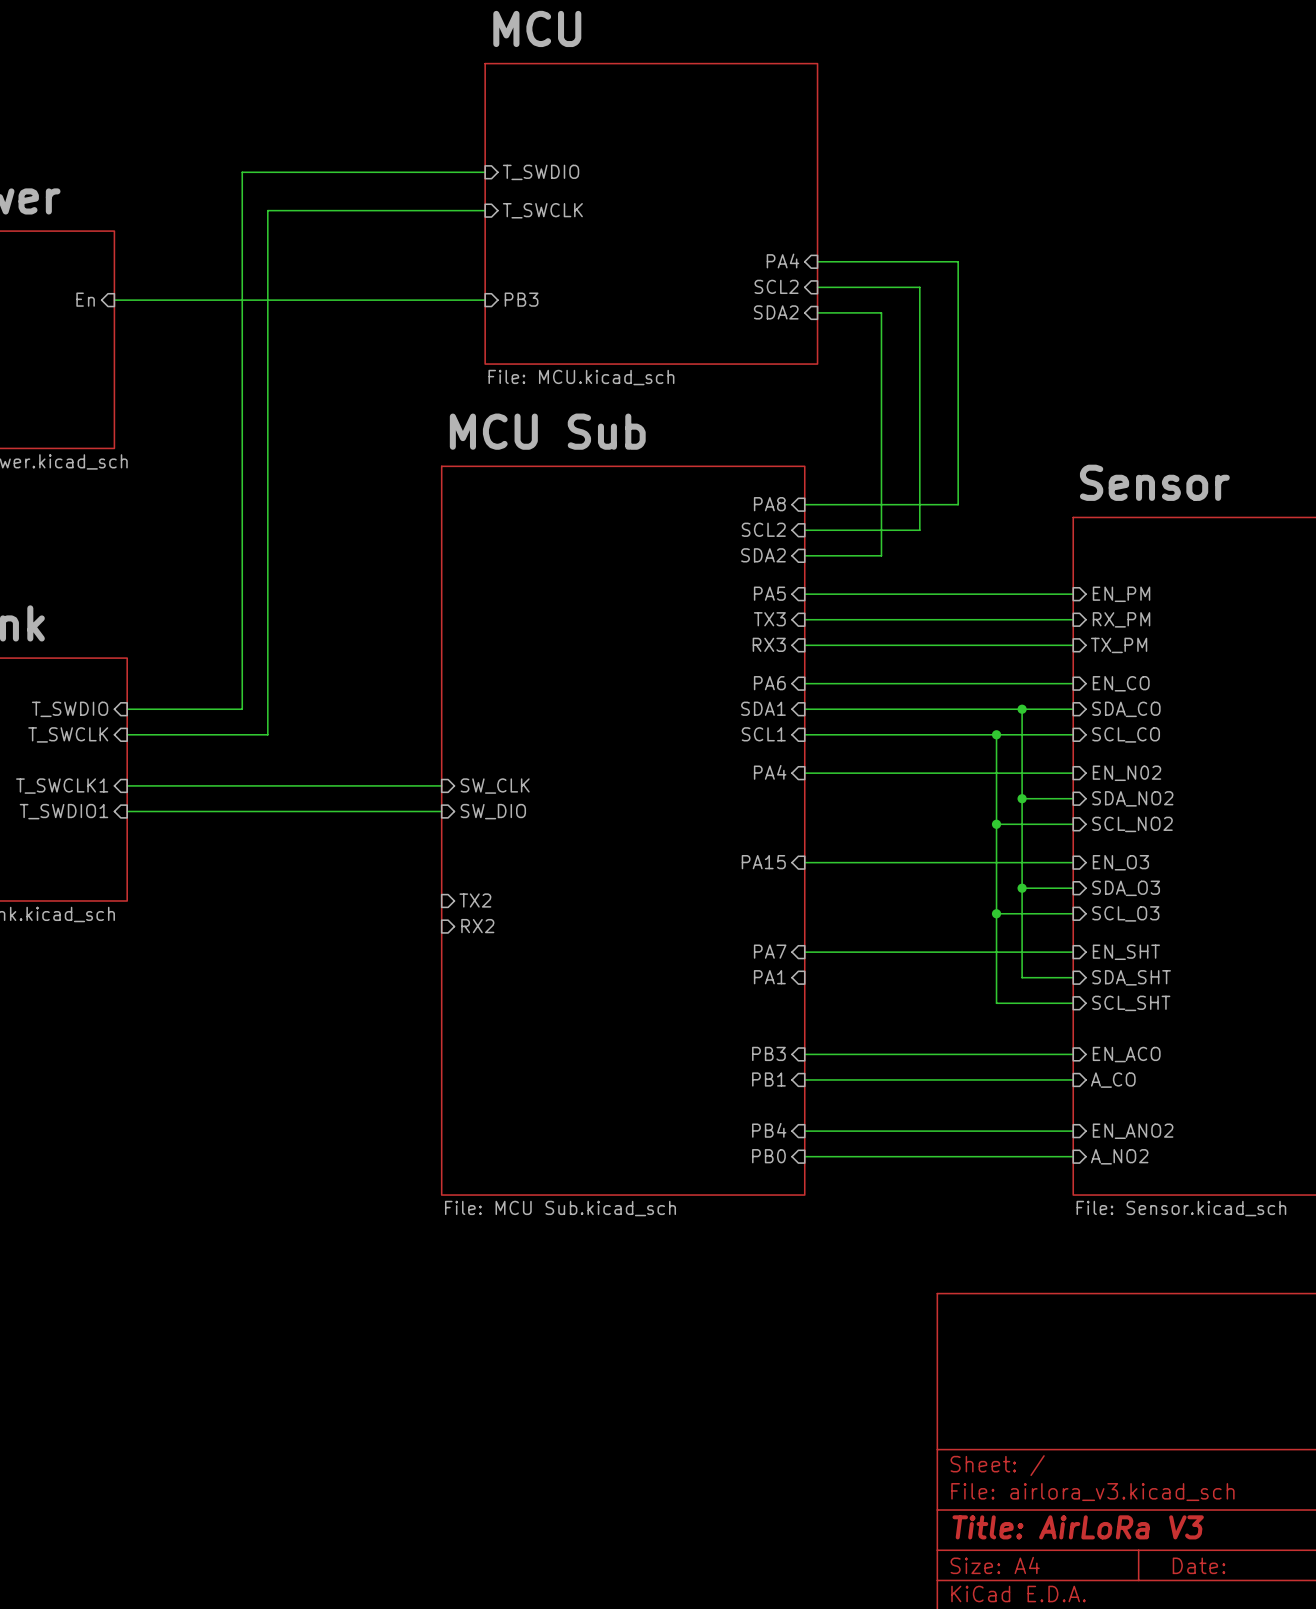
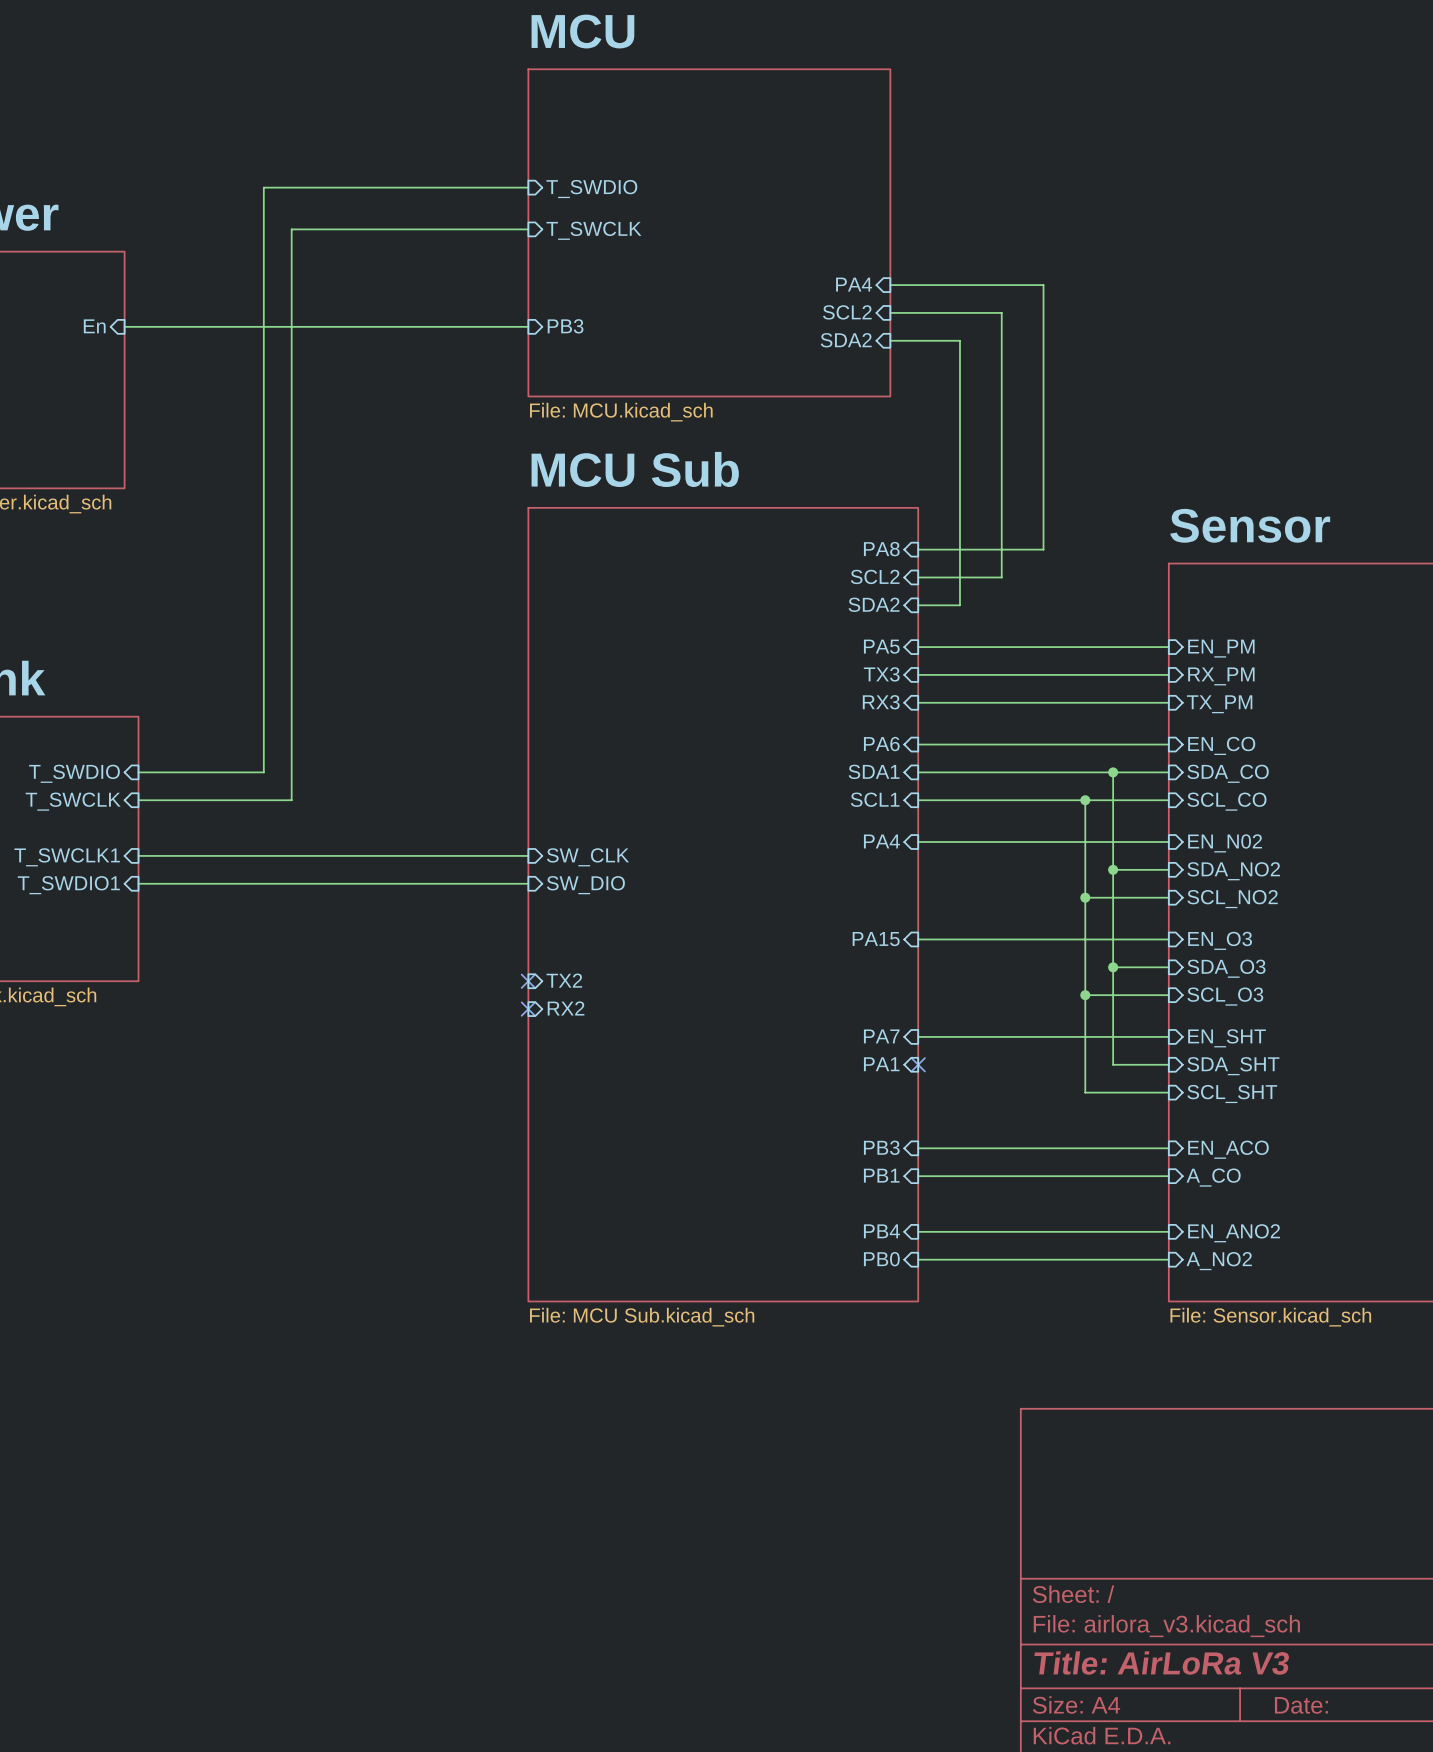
sheet pin position: PA8 (769, 504) -> PA8 (881, 549)
wire: (804, 504) (843, 504) -> none
sheet pin position: SCL2 (763, 529) -> SCL2 (875, 576)
wire: (804, 530) (843, 530) -> none
sheet pin position: SDA2 (763, 555) -> SDA2 (874, 604)
wire: (804, 555) (843, 555) -> none
sheet pin position: PA5 (769, 593) -> PA5 (881, 646)
wire: (804, 594) (843, 594) -> none
sheet pin position: TX3 (769, 619) -> TX3 (881, 674)
wire: (804, 619) (843, 619) -> none
sheet pin position: RX3 (769, 644) -> RX3 (881, 702)
wire: (804, 645) (843, 645) -> none
sheet pin position: PA6 (769, 683) -> PA6 (881, 744)
wire: (804, 683) (843, 683) -> none
sheet pin position: SDA1 (763, 708) -> SDA1 (874, 771)
wire: (804, 709) (843, 709) -> none
sheet pin position: SCL1 (763, 734) -> SCL1 (875, 799)
wire: (804, 734) (843, 734) -> none
sheet pin position: PA4 (770, 772) -> PA4 (881, 841)
wire: (804, 773) (843, 773) -> none
wire: none -> (481, 855) (528, 855)
sheet pin position: SW_CLK (495, 786) -> SW_CLK (588, 857)
wire: none -> (481, 883) (528, 883)
sheet pin position: SW_DIO (493, 811) -> SW_DIO (585, 885)
sheet MCU Sub: File: MCU Sub.kicad_sch (623, 830) -> none
sheet MCU Sub: none -> File: MCU Sub.kicad_sch (723, 904)
sheet pin position: PA15 (763, 862) -> PA15 (876, 939)
wire: (804, 862) (843, 862) -> none
sheet pin position: TX2 (475, 900) -> TX2 (564, 980)
no-connect mark: none -> (528, 981)
sheet pin position: RX2 (477, 926) -> RX2 (566, 1008)
no-connect mark: none -> (528, 1009)
sheet pin position: PA7 (770, 951) -> PA7 (881, 1036)
wire: (804, 952) (843, 952) -> none
sheet pin position: PA1 (769, 977) -> PA1 (881, 1064)
no-connect mark: none -> (918, 1064)
sheet pin position: PB3 (768, 1053) -> PB3 (881, 1147)
wire: (804, 1054) (843, 1054) -> none
sheet pin position: PB1 (768, 1079) -> PB1 (881, 1175)
wire: (804, 1079) (843, 1079) -> none
sheet pin position: PB4 (769, 1130) -> PB4 (881, 1231)
wire: (804, 1131) (843, 1131) -> none
sheet pin position: PB0 (768, 1156) -> PB0 (881, 1259)
wire: (804, 1156) (843, 1156) -> none

